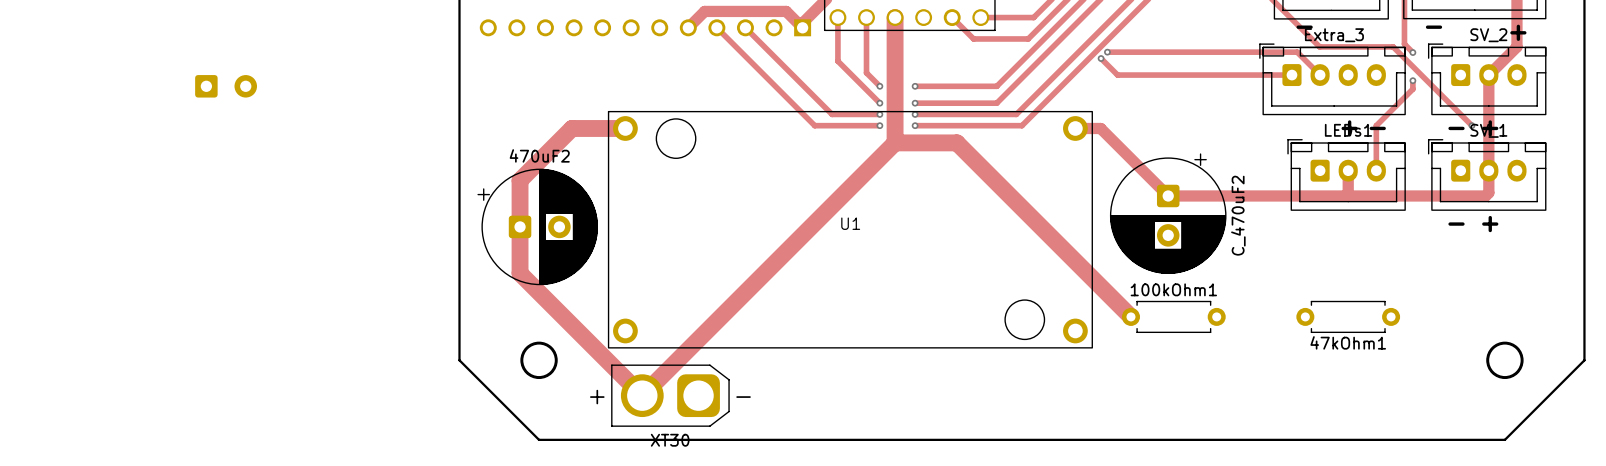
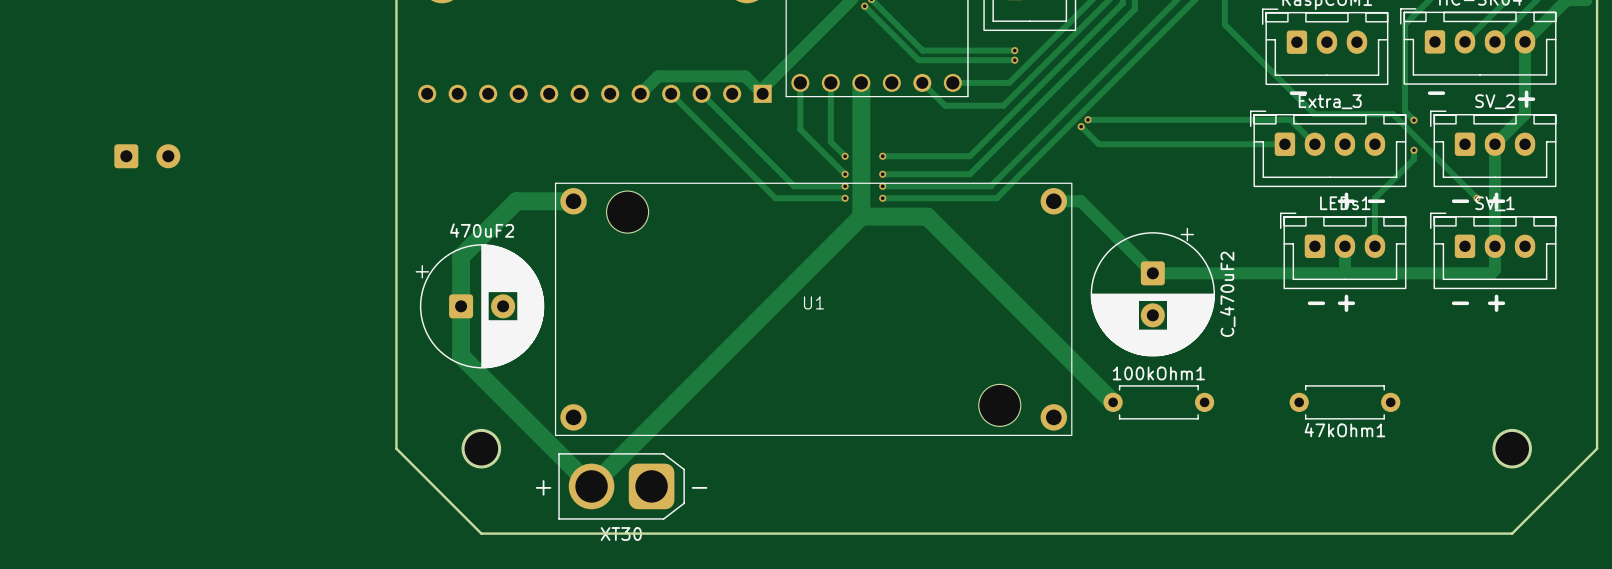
text: none -> - (1316, 303)
text: none -> + (1346, 303)

